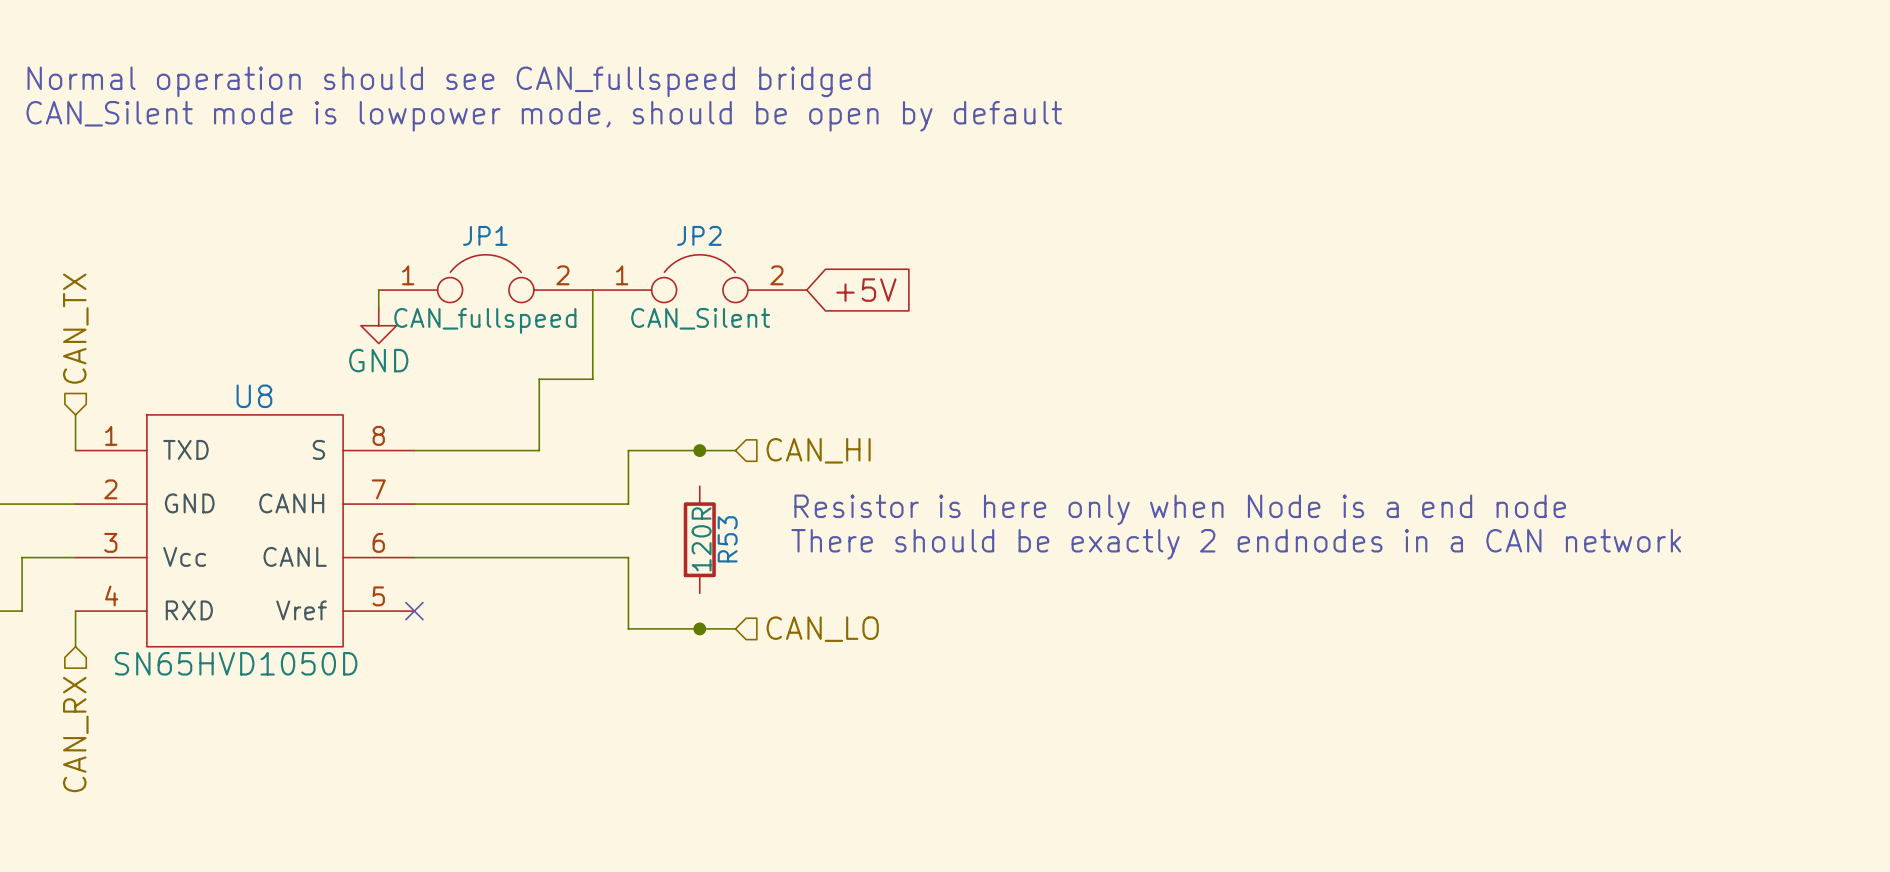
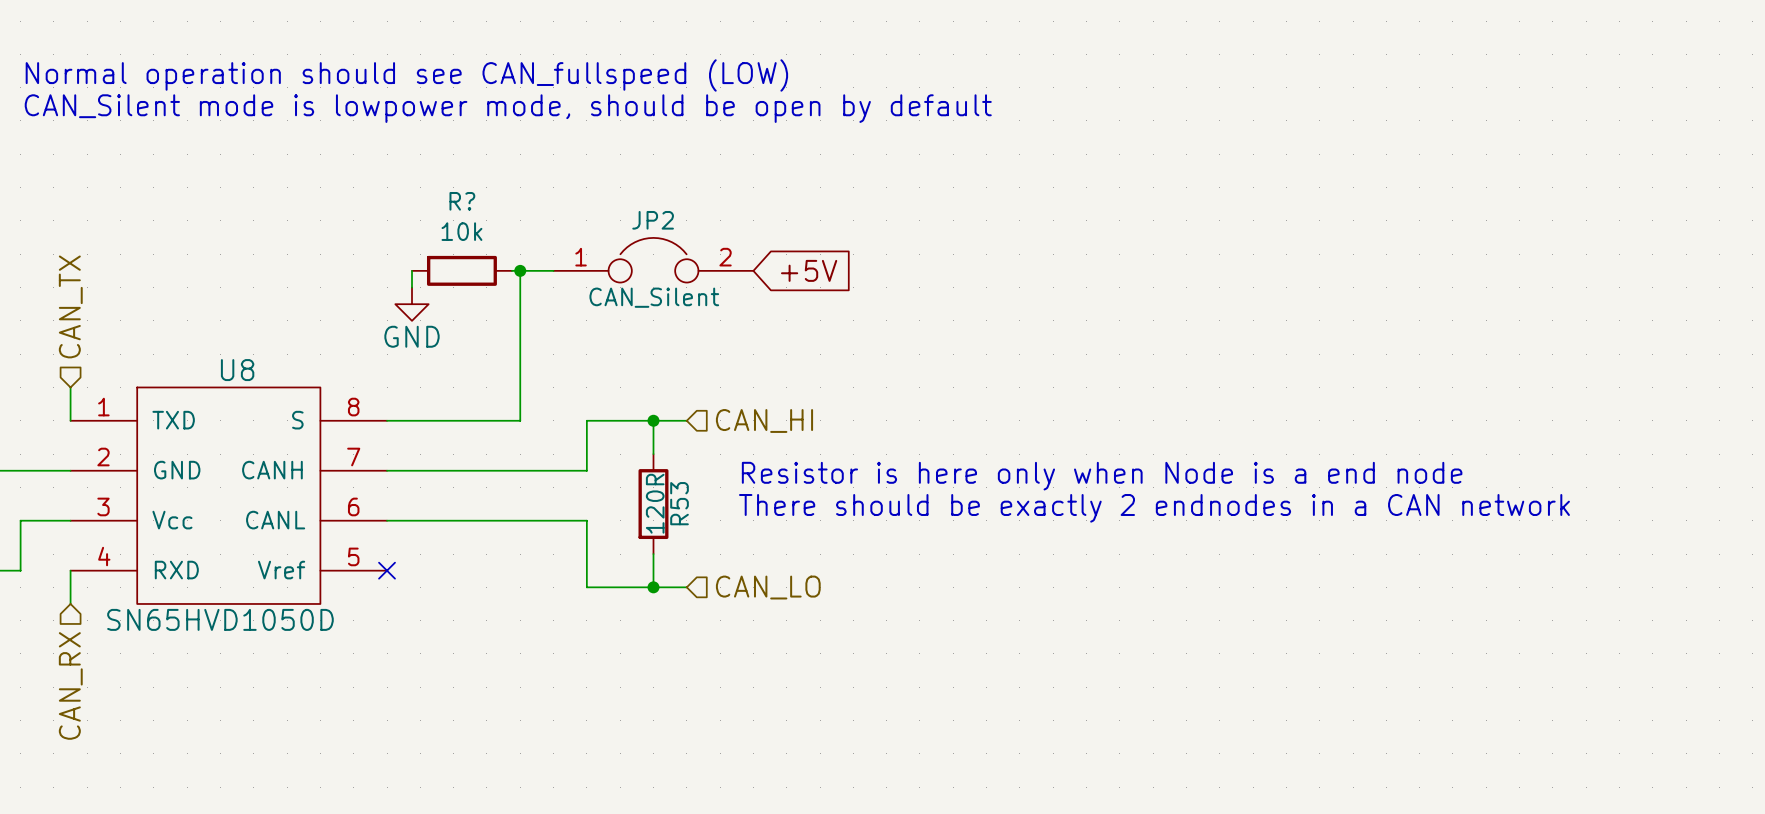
text: Normal operation should see CAN_fullspeed bridged (448, 81) -> Normal operation should see CAN_fullspeed (LOW) (406, 75)
JP1: CAN_fullspeed (485, 278) -> none
wire: (378, 290) (378, 307) -> (412, 270) (412, 287)
R?: none -> 10k (461, 270)
junction: none -> (520, 270)
wire: (592, 290) (592, 379) (539, 379) (539, 450) -> (520, 270) (520, 420) (503, 420)
power symbol position: GND (378, 325) -> GND (412, 304)
wire: none -> (653, 420) (653, 454)
wire: none -> (653, 554) (653, 587)

